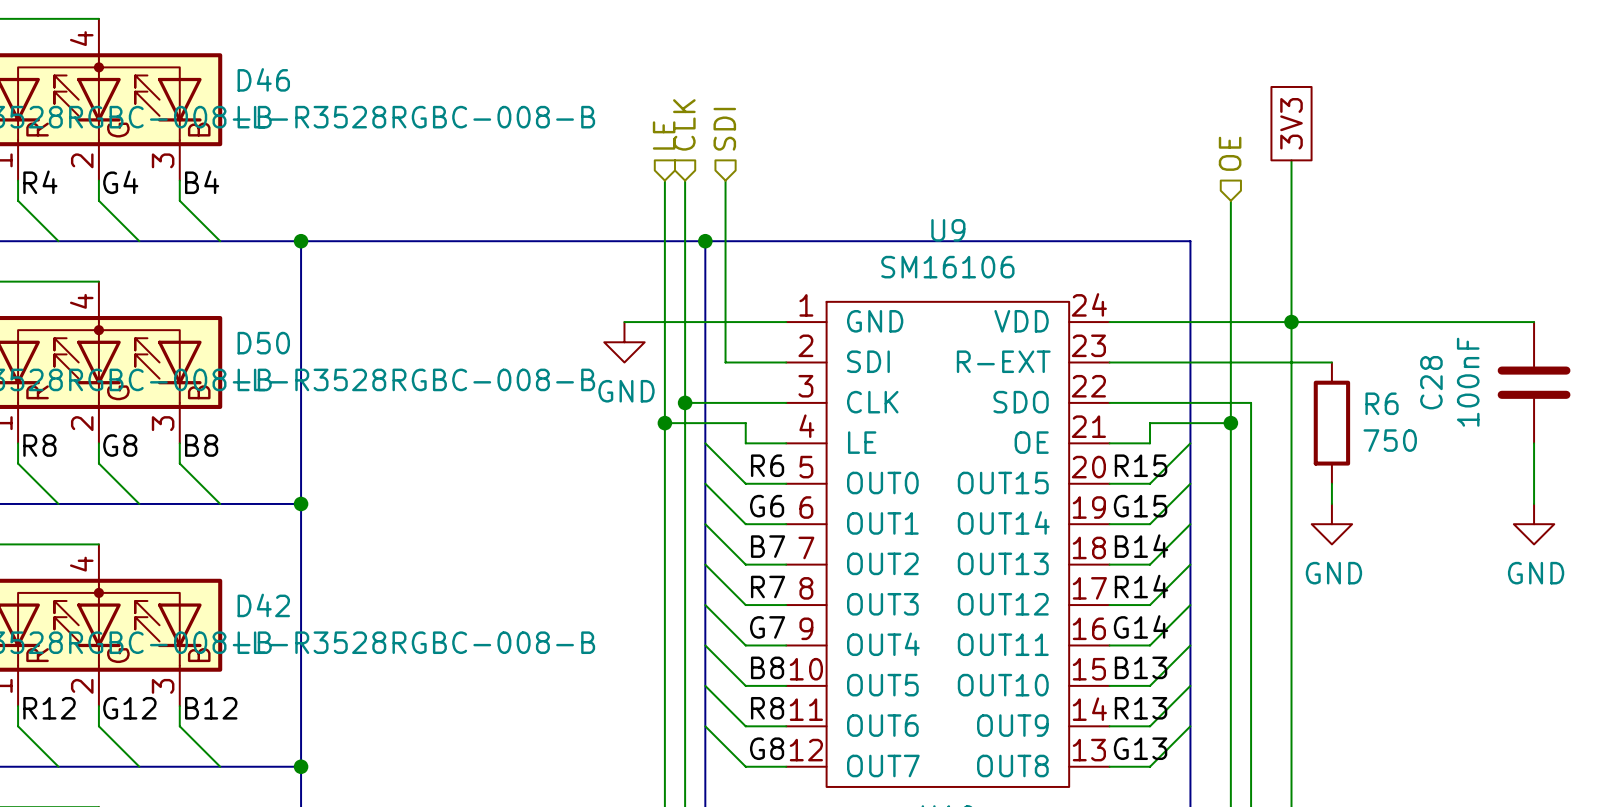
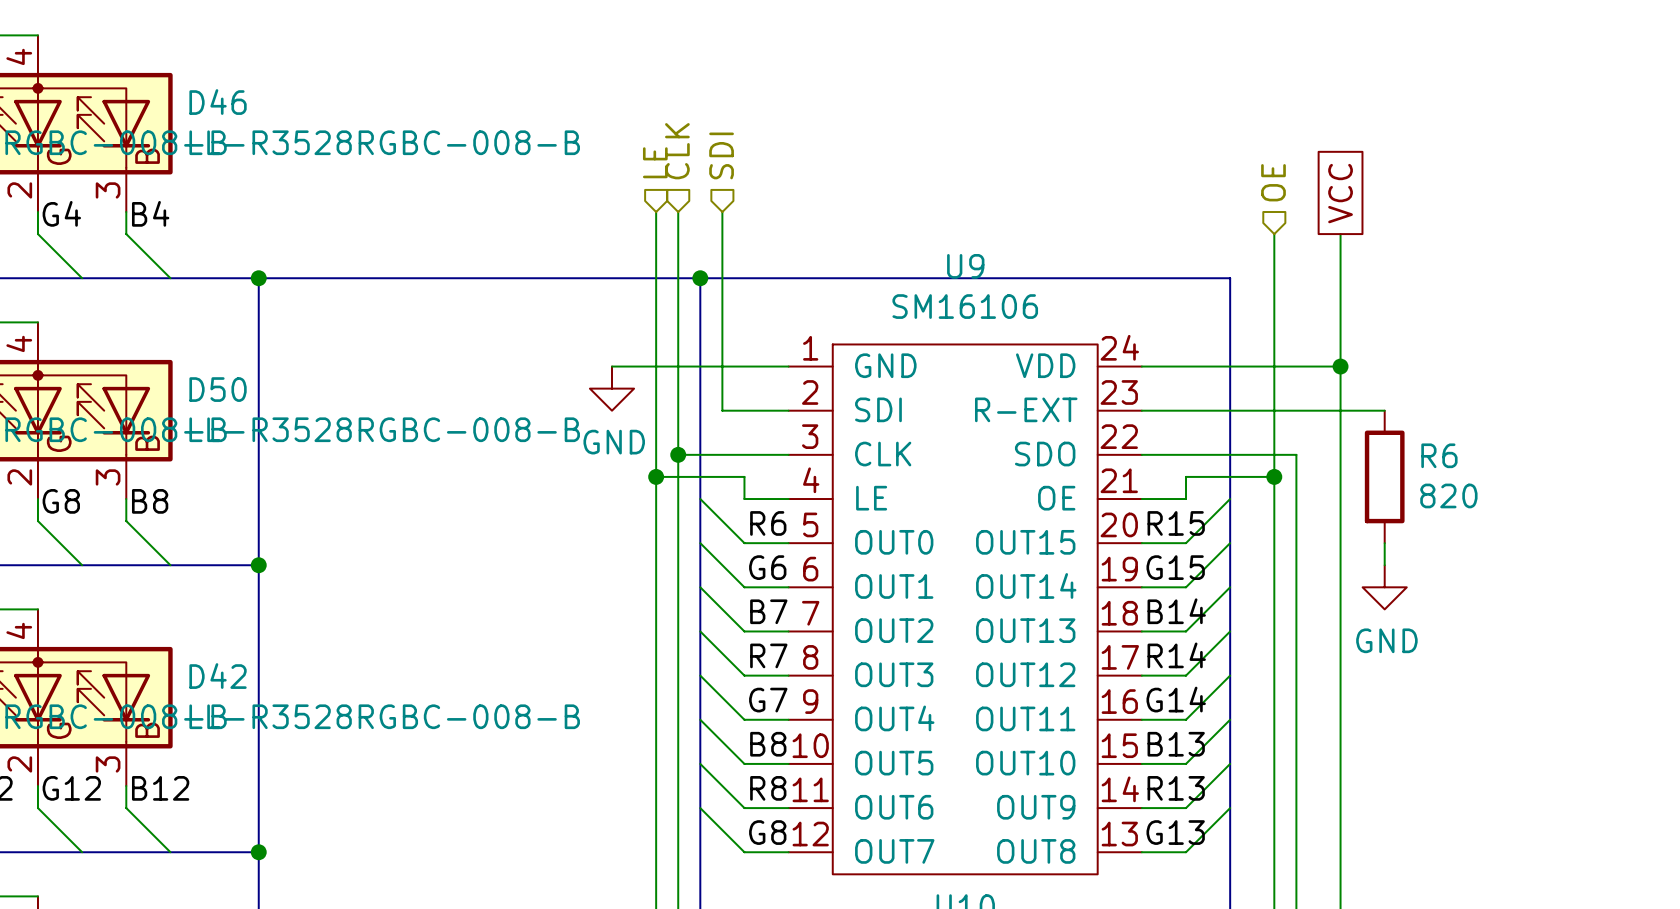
global label: 3V3 (1291, 123) -> none
wire: (1291, 160) (1291, 200) -> none
global label: none -> VCC (1340, 193)
wire: (1291, 322) (1534, 322) -> none
C28: 100nF (1534, 382) -> none
R6 value: 750 (1390, 440) -> 820 (1448, 495)
wire: (1534, 443) (1534, 503) -> none
power symbol: GND (1534, 524) -> none

